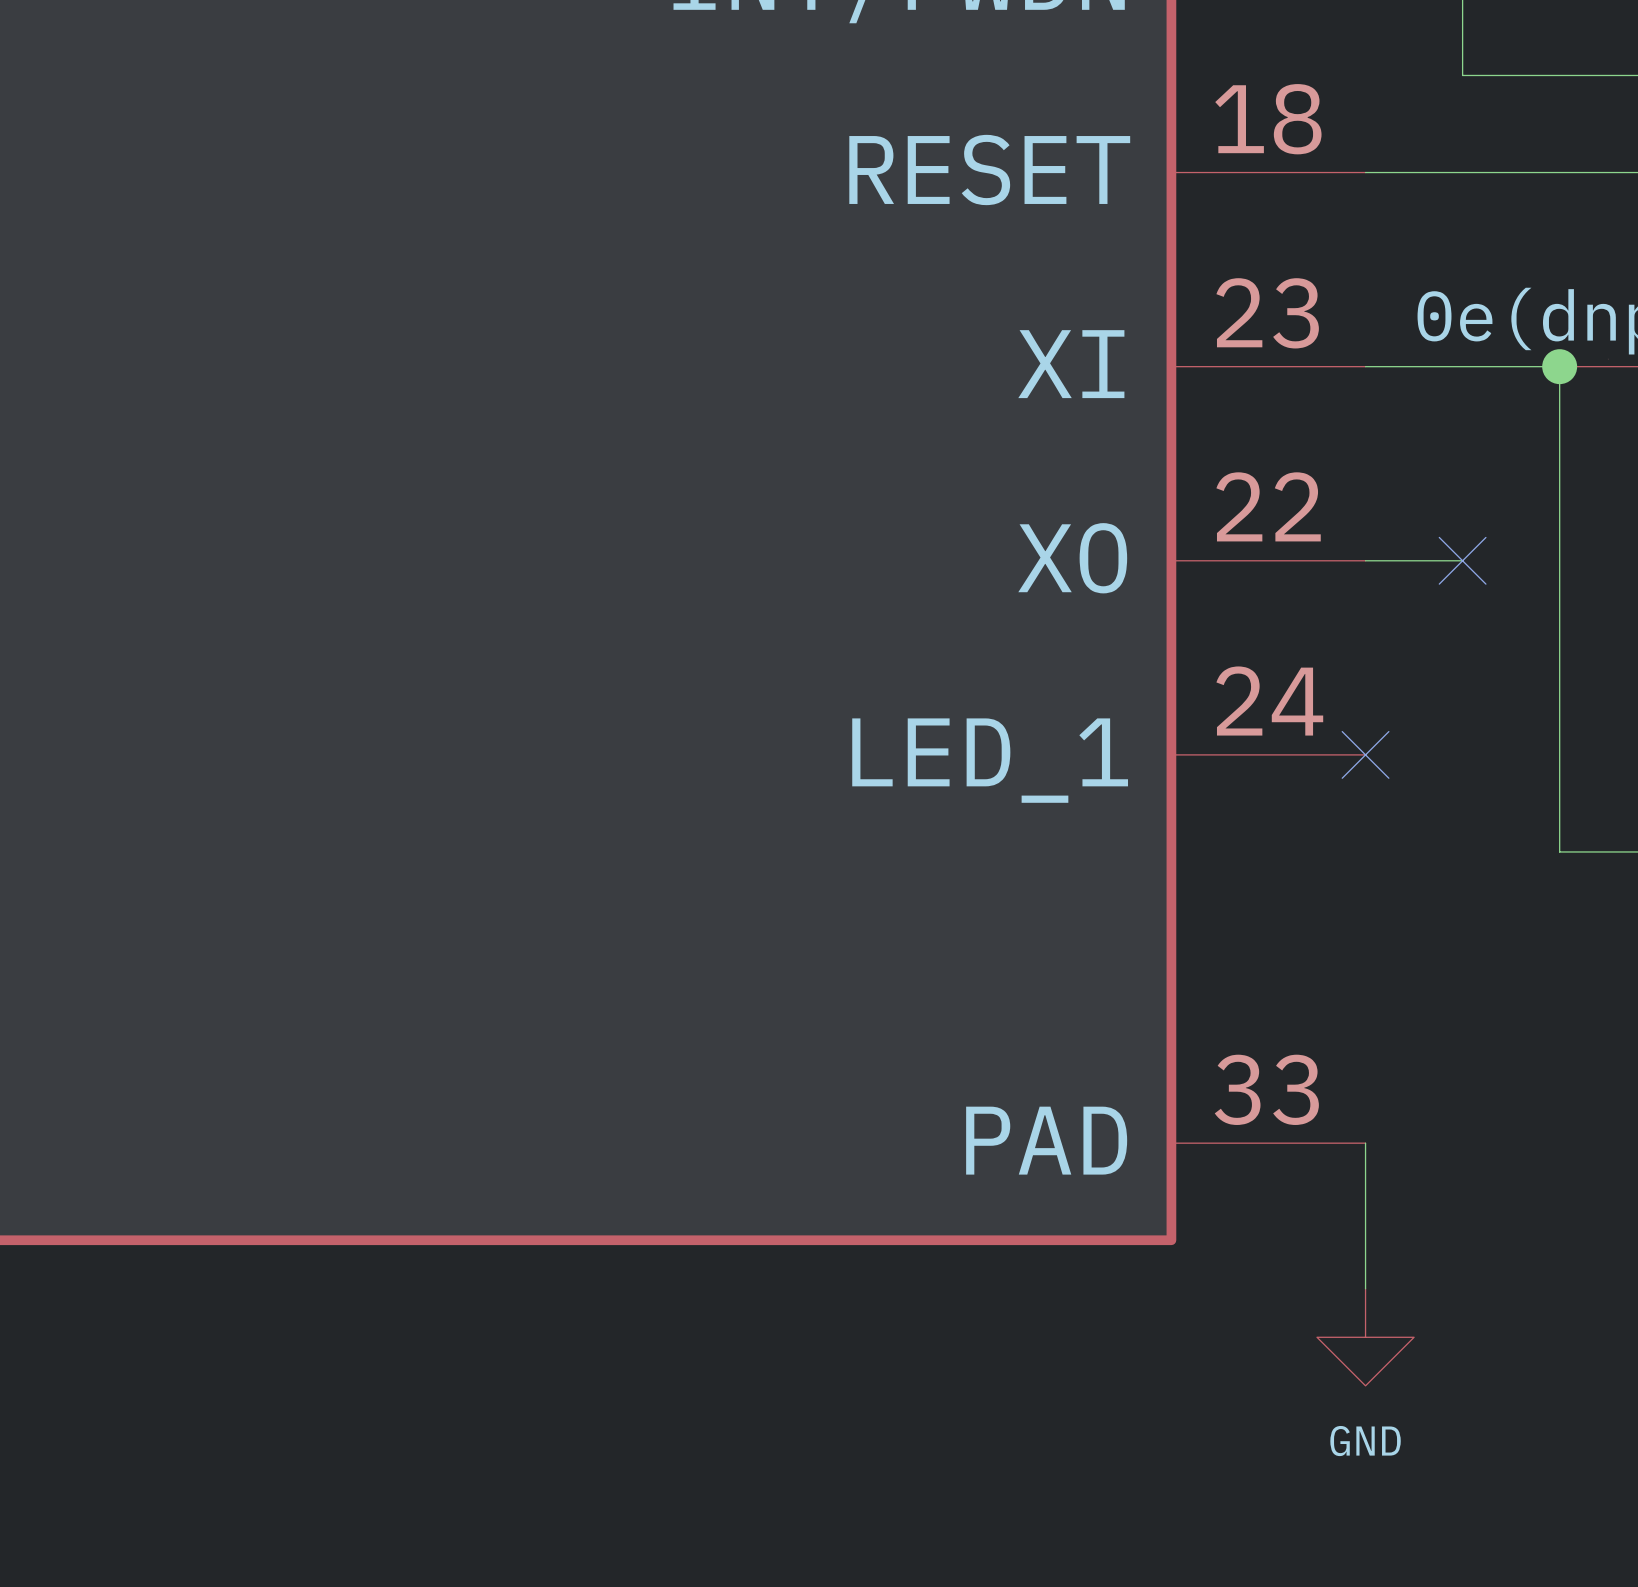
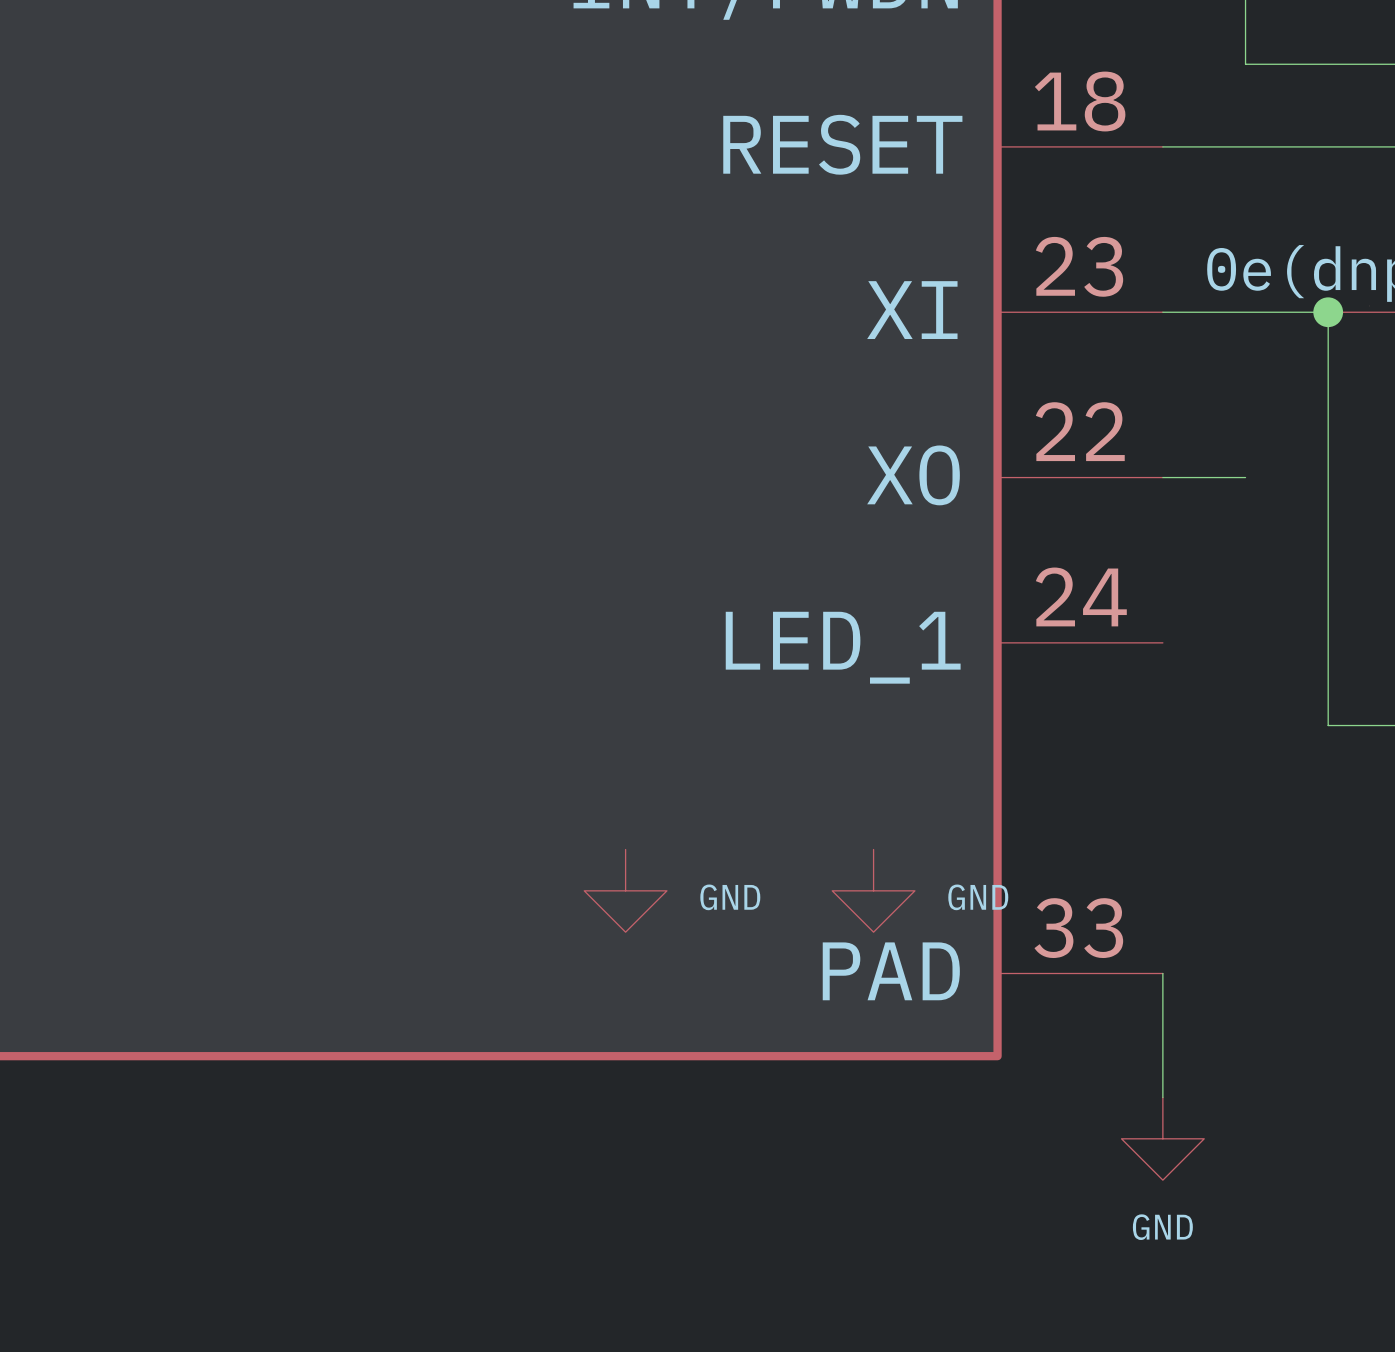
no-connect mark: (1462, 560) -> none
no-connect mark: (1365, 754) -> none
power symbol: none -> GND (625, 890)
power symbol: none -> GND (873, 890)

